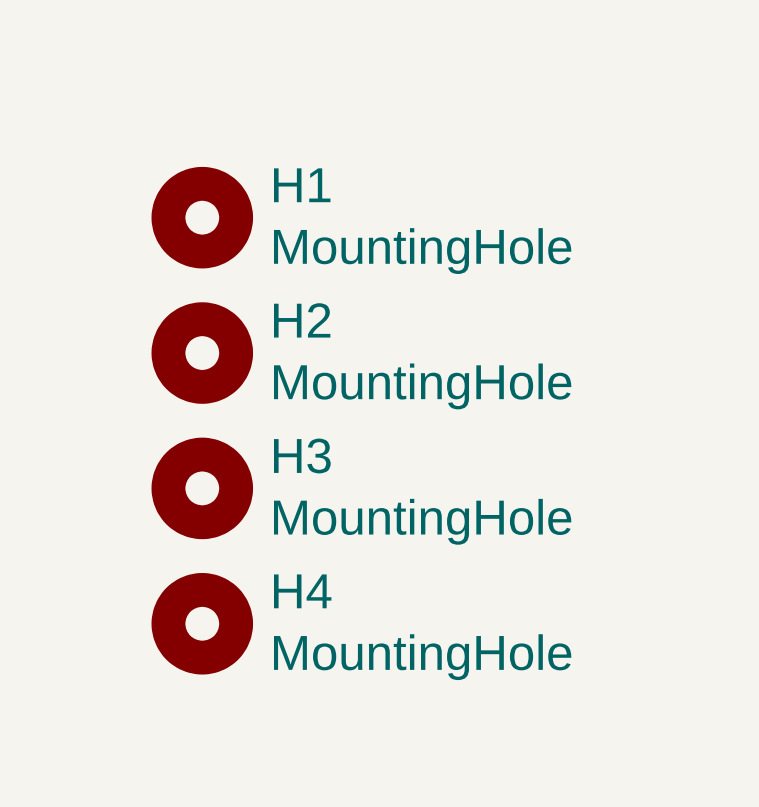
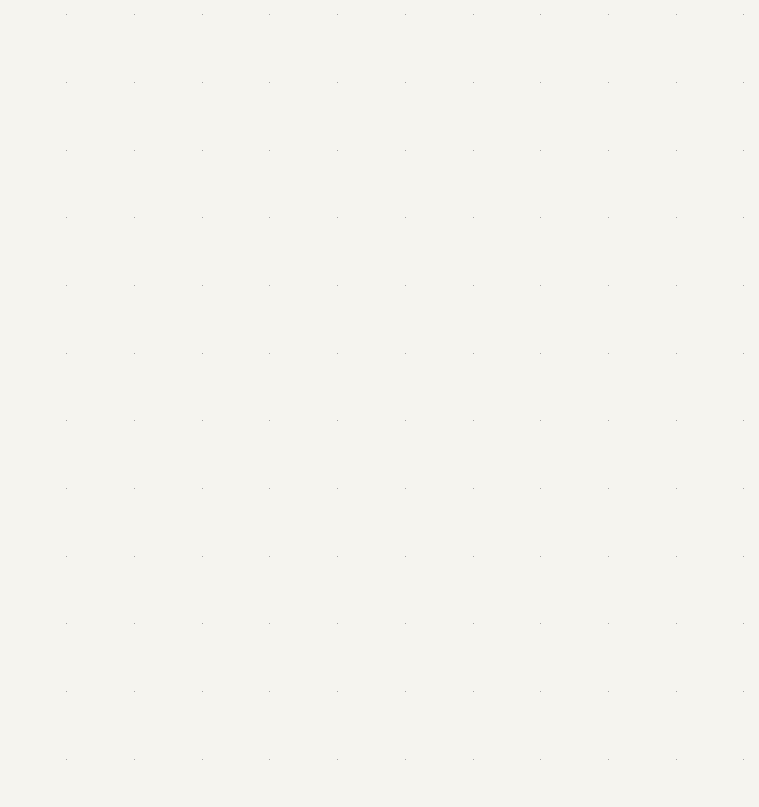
H1: MountingHole (202, 217) -> none
H2: MountingHole (202, 353) -> none
H3: MountingHole (202, 488) -> none
H4: MountingHole (202, 623) -> none

